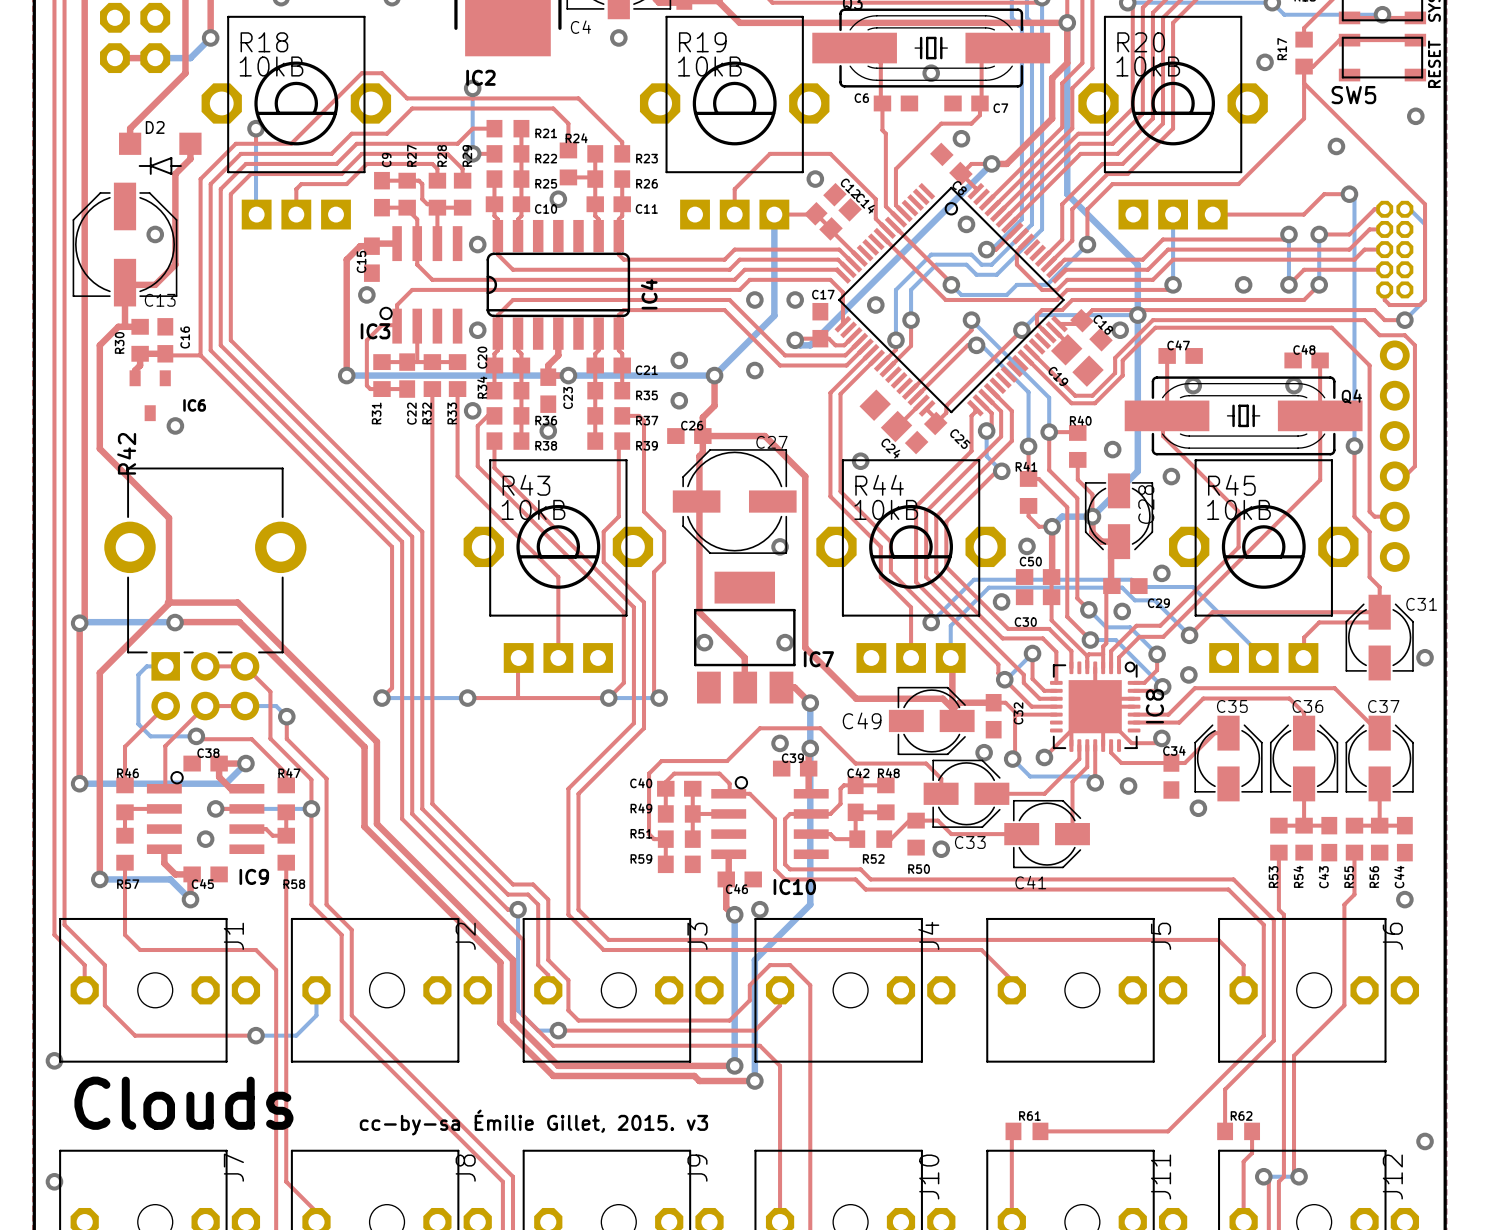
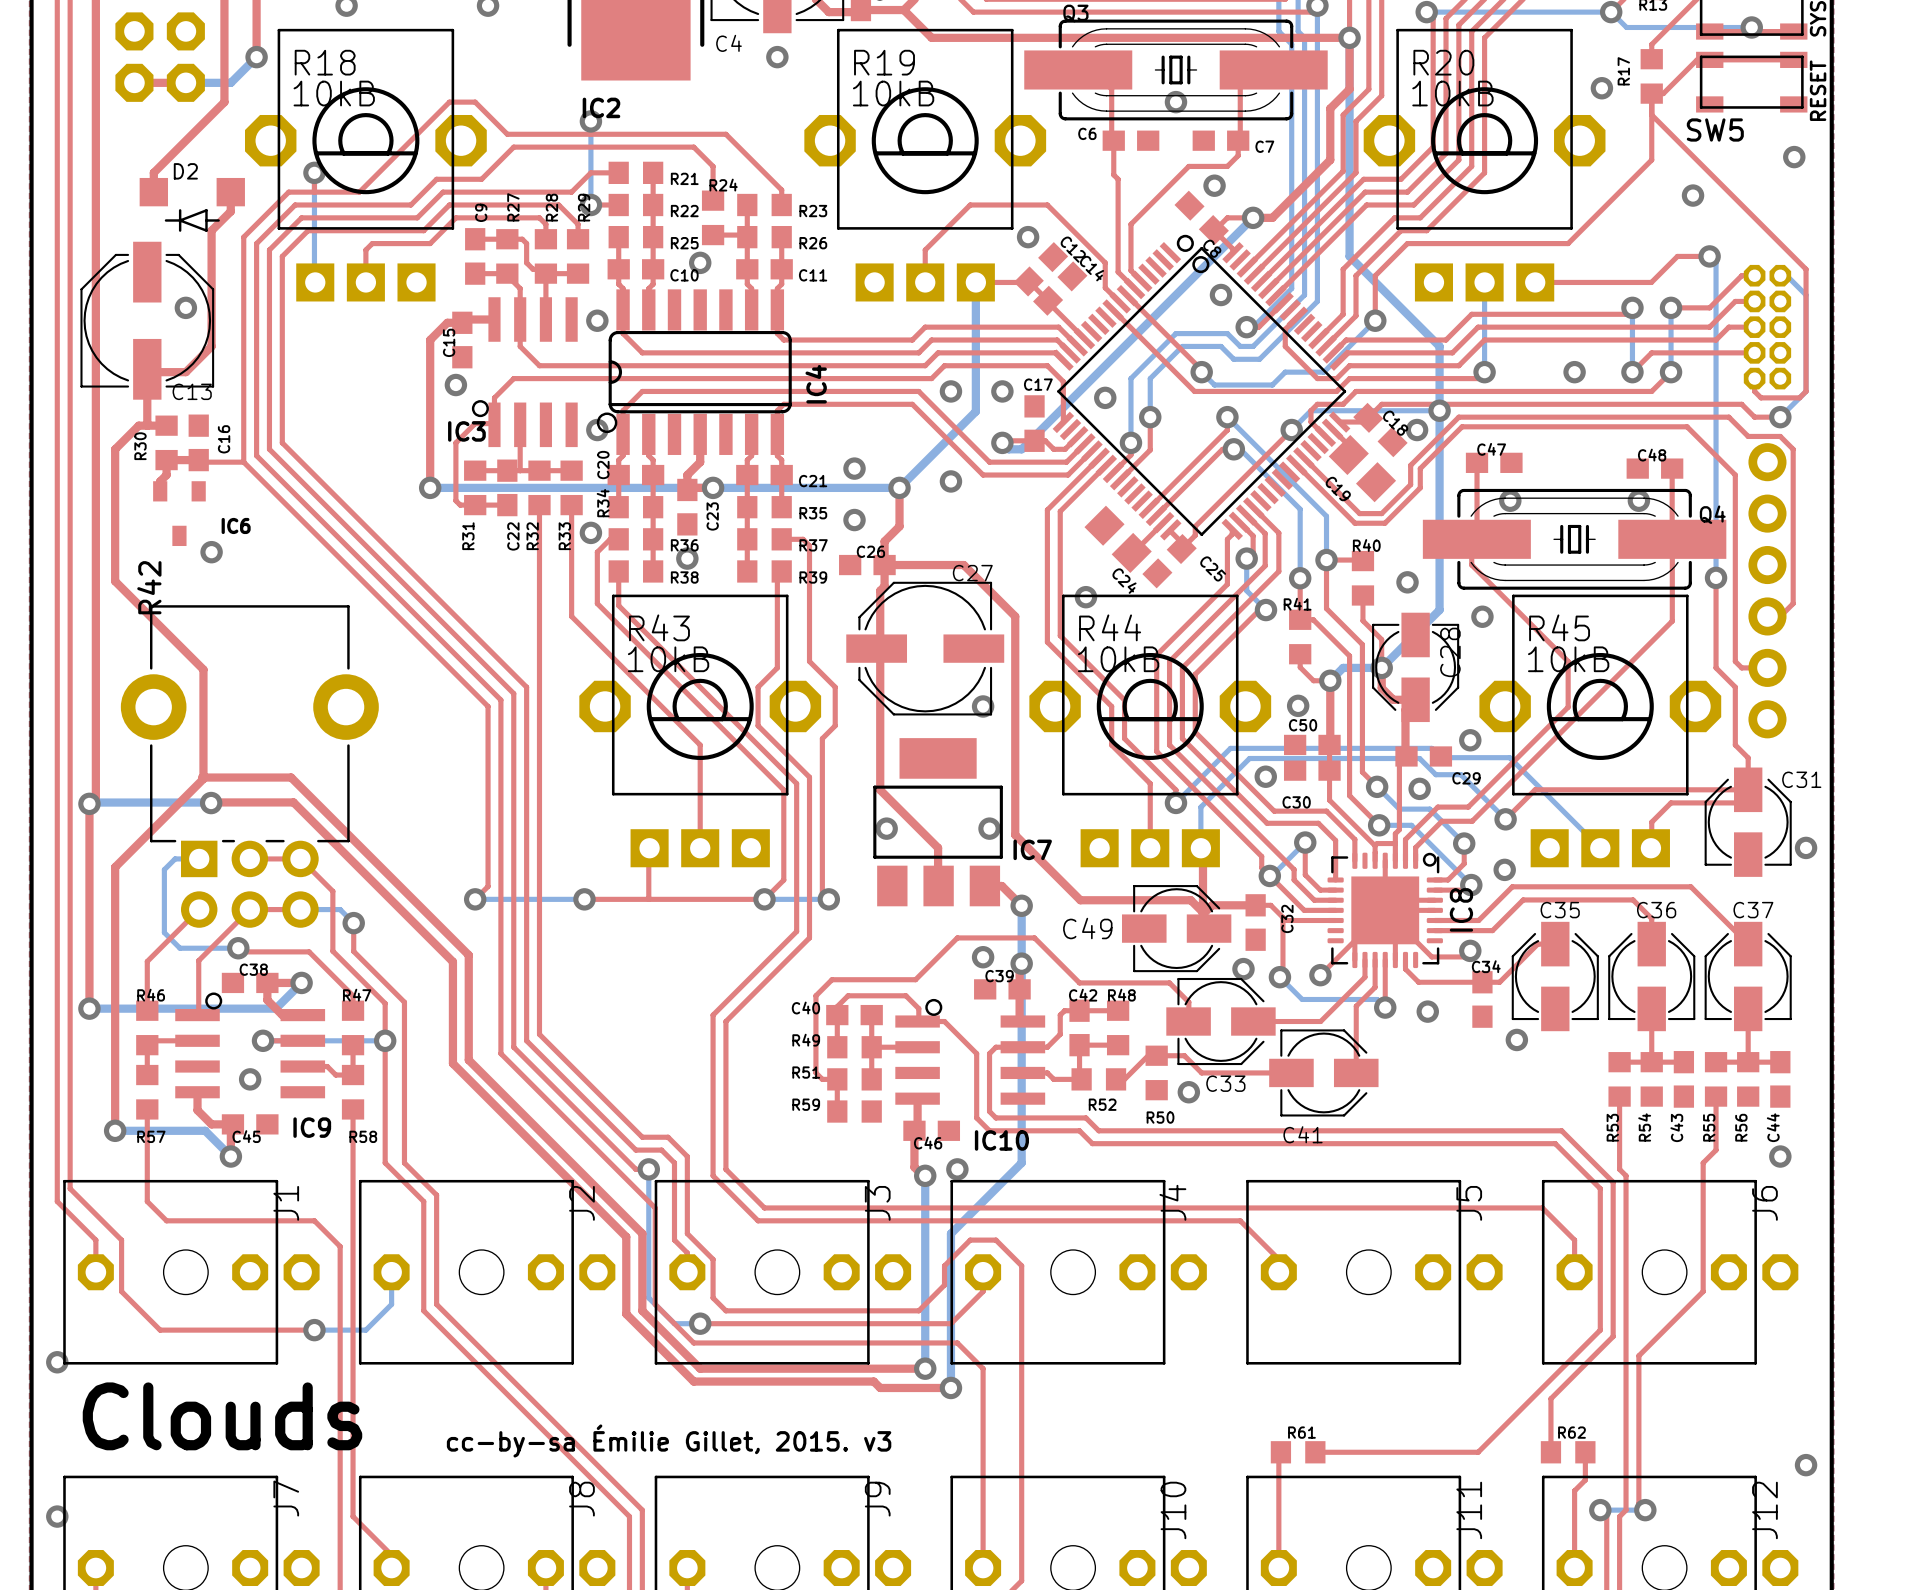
part footprint: [834, 182, 1069, 417] -> [1052, 234, 1352, 541]
IC4 footprint: [486, 219, 631, 350] -> [596, 289, 792, 455]

